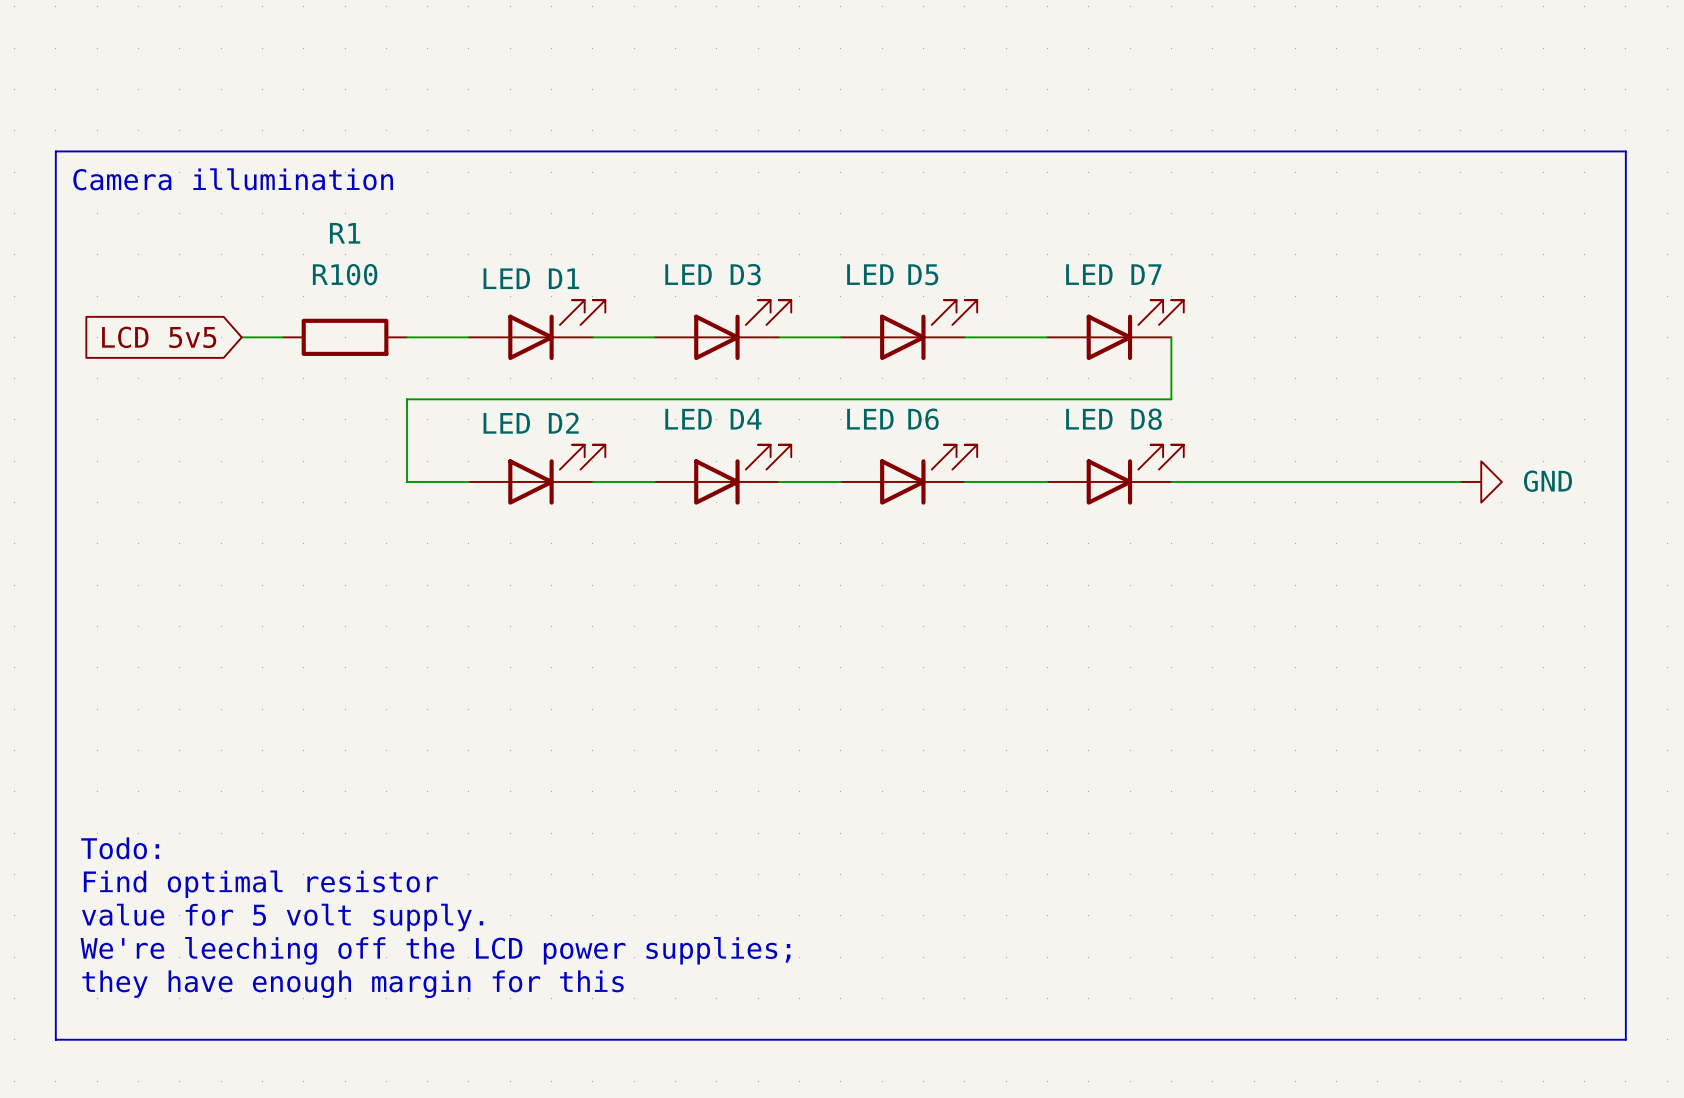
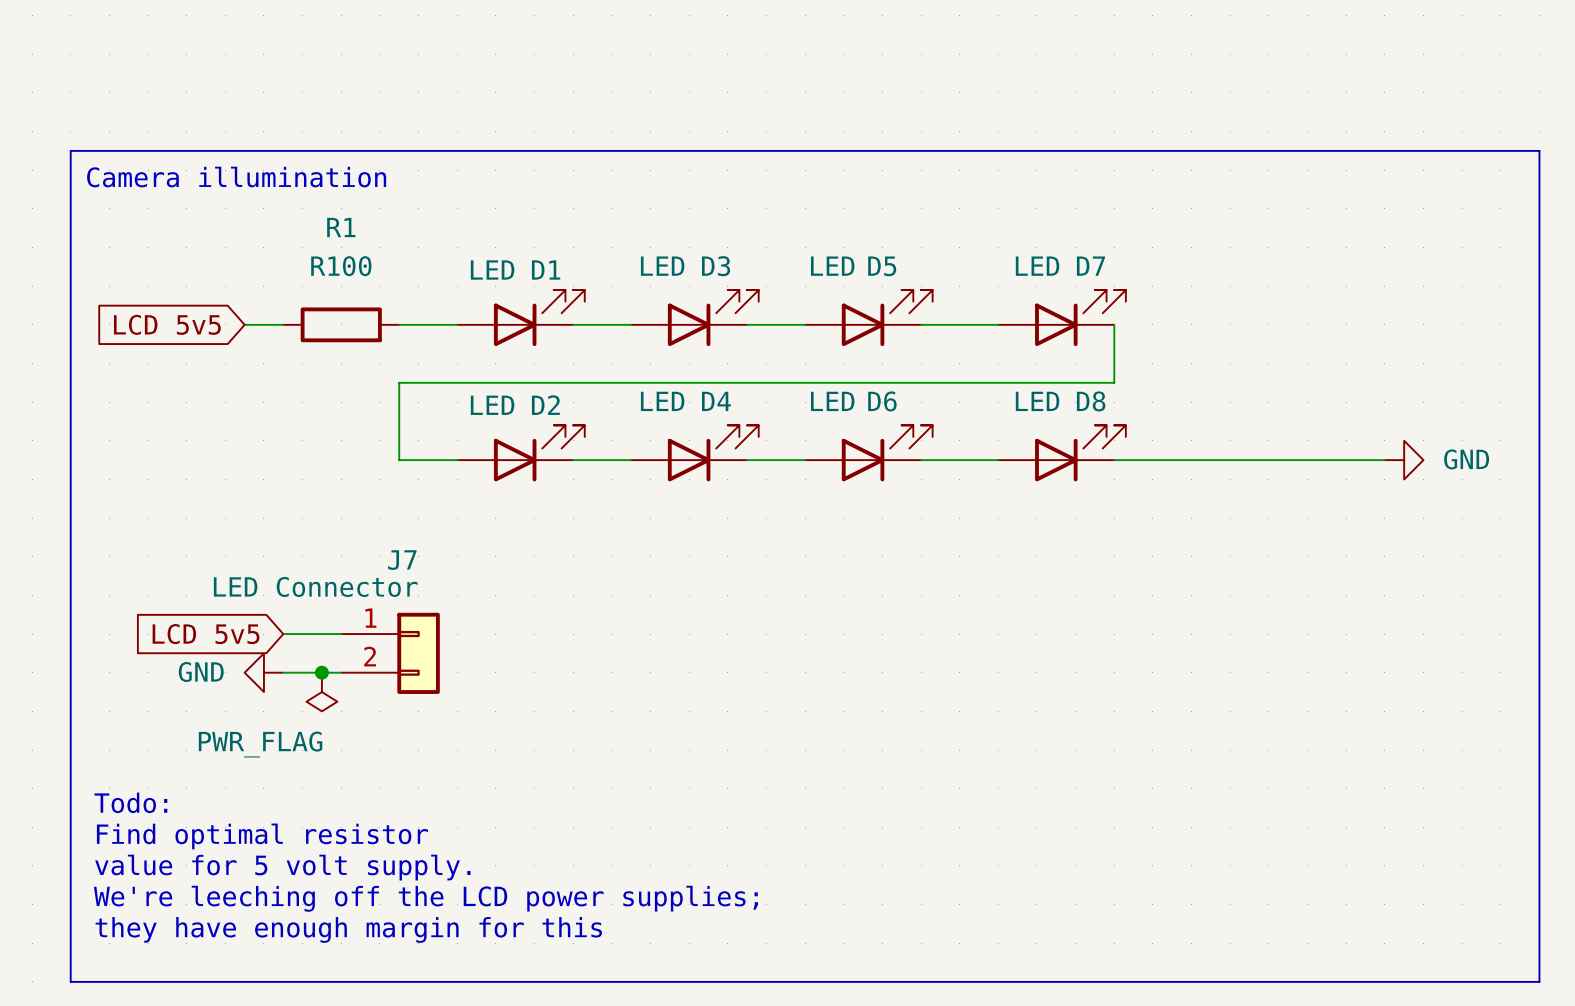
global label: none -> LCD 5v5 (206, 634)
wire: none -> (283, 634) (341, 634)
J7: none -> LED Connector (390, 653)
power symbol: none -> GND (263, 672)
wire: none -> (283, 672) (341, 672)
junction: none -> (321, 672)
power symbol: none -> PWR_FLAG (321, 692)

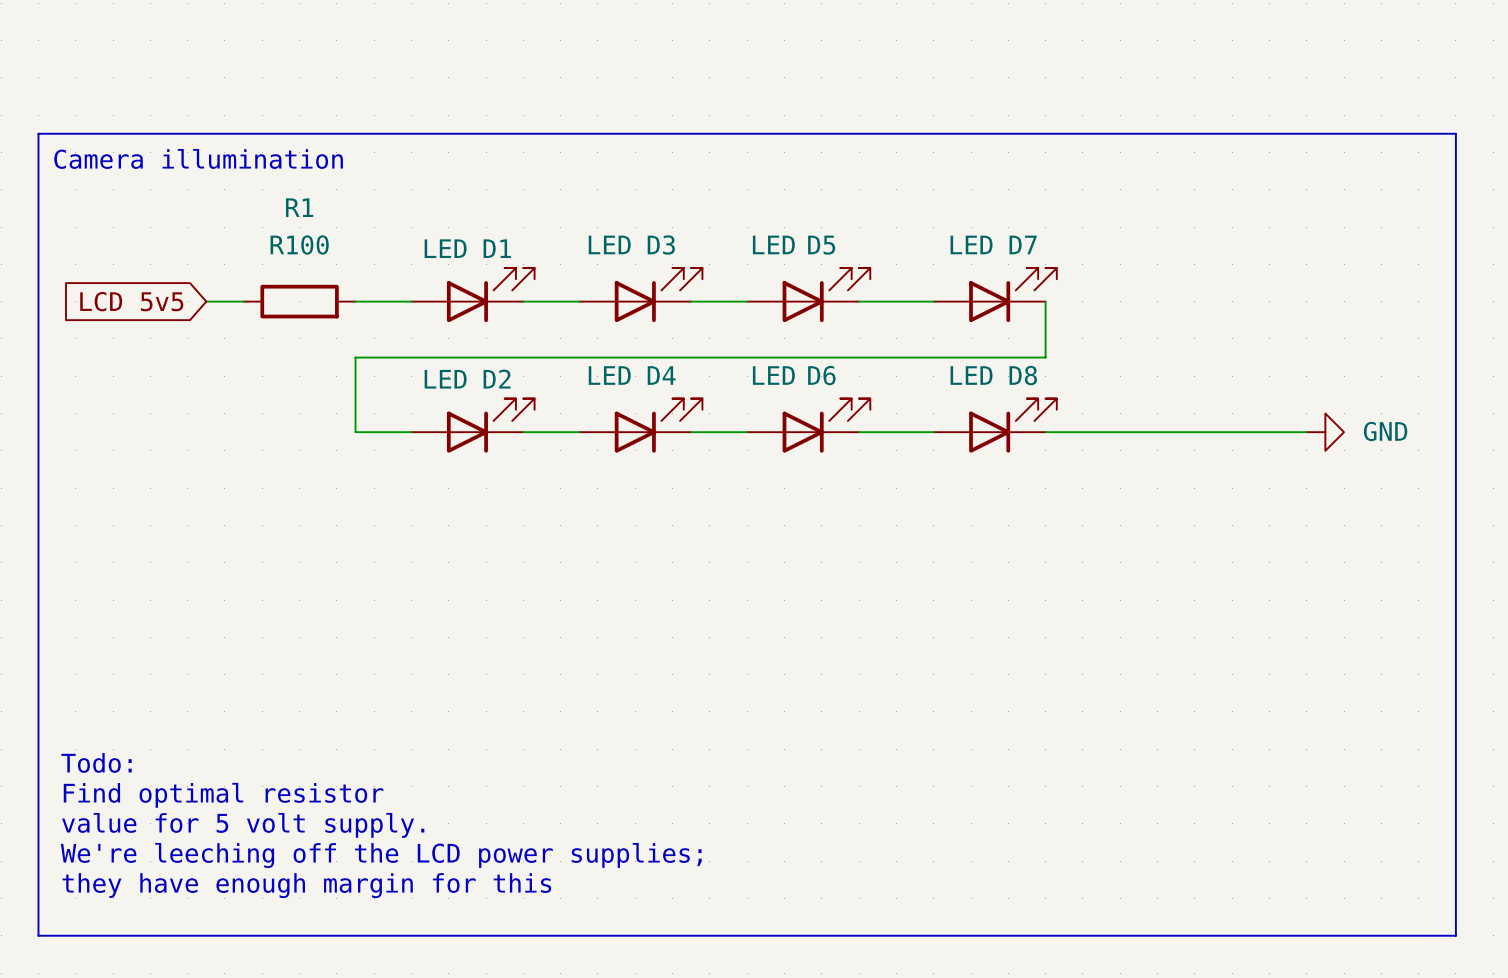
global label: LCD 5v5 (206, 634) -> none
wire: (283, 634) (341, 634) -> none
J7: LED Connector (390, 653) -> none
power symbol: GND (263, 672) -> none
wire: (283, 672) (341, 672) -> none
junction: (321, 672) -> none
power symbol: PWR_FLAG (321, 692) -> none

